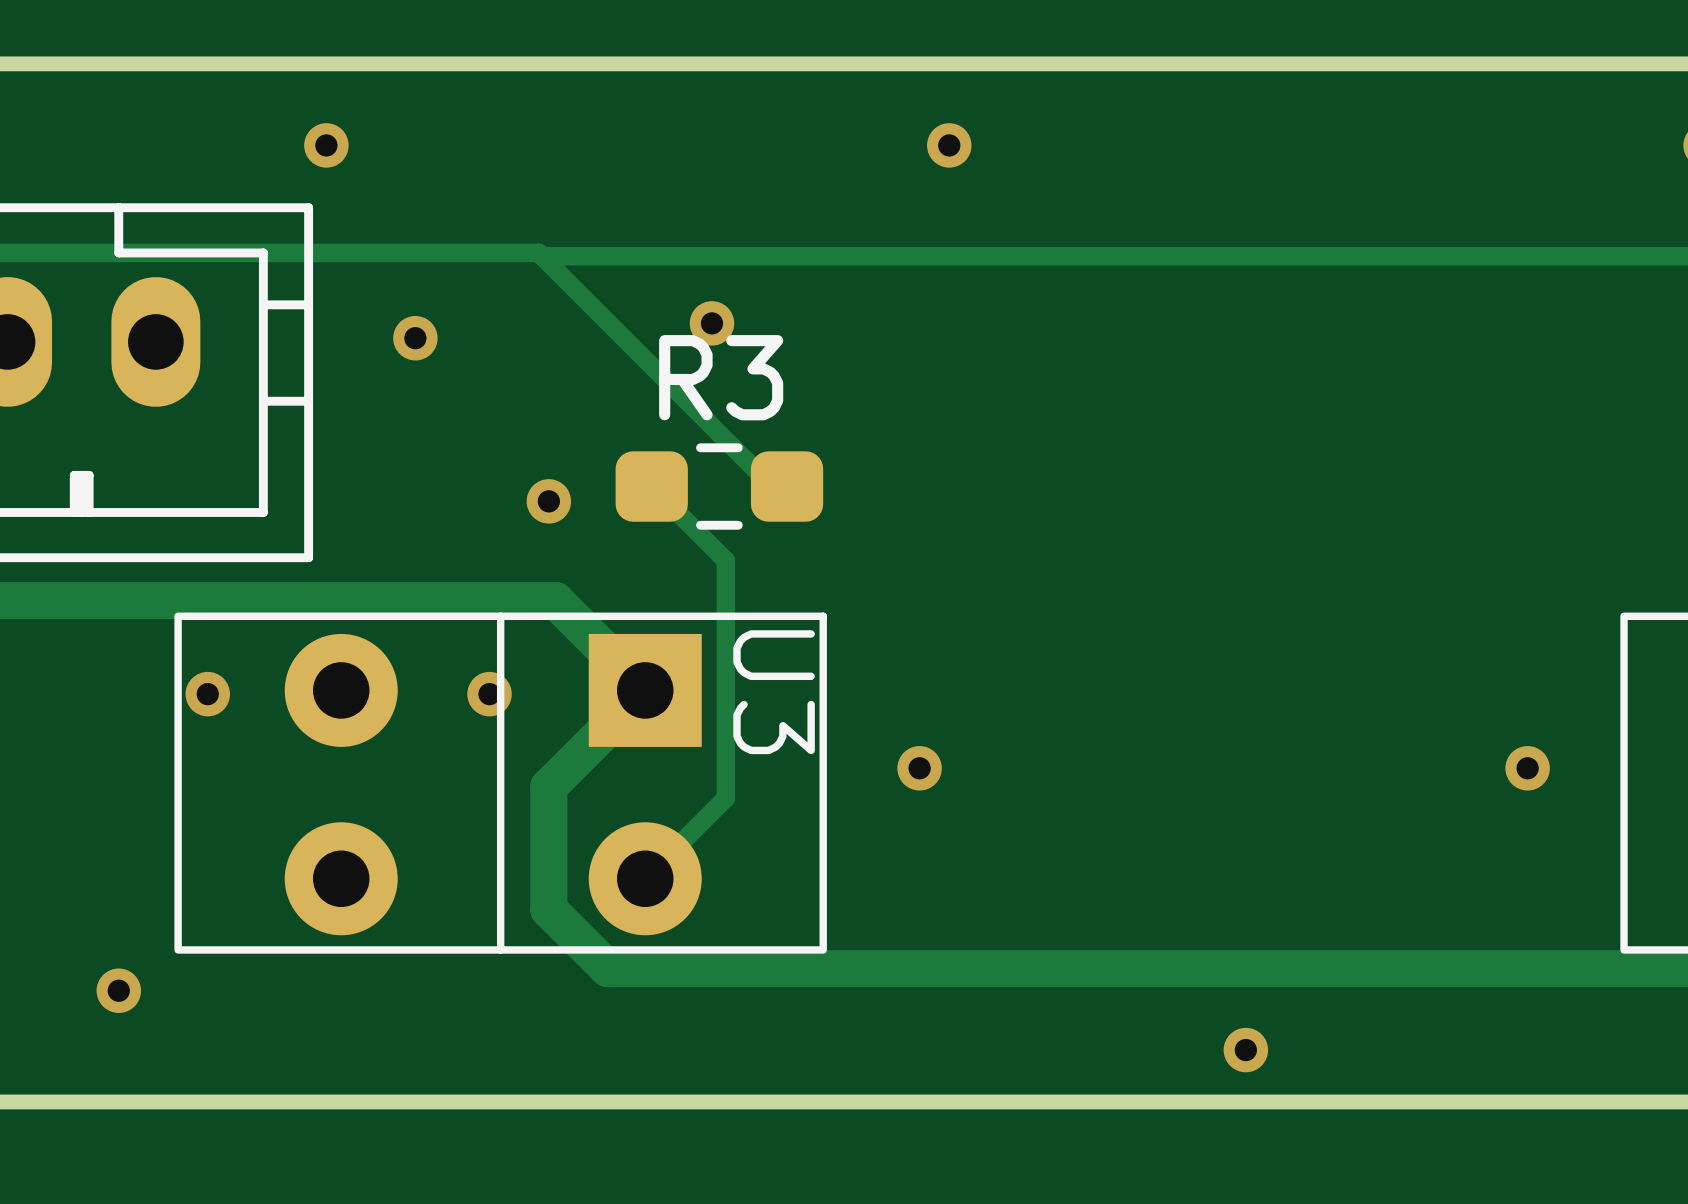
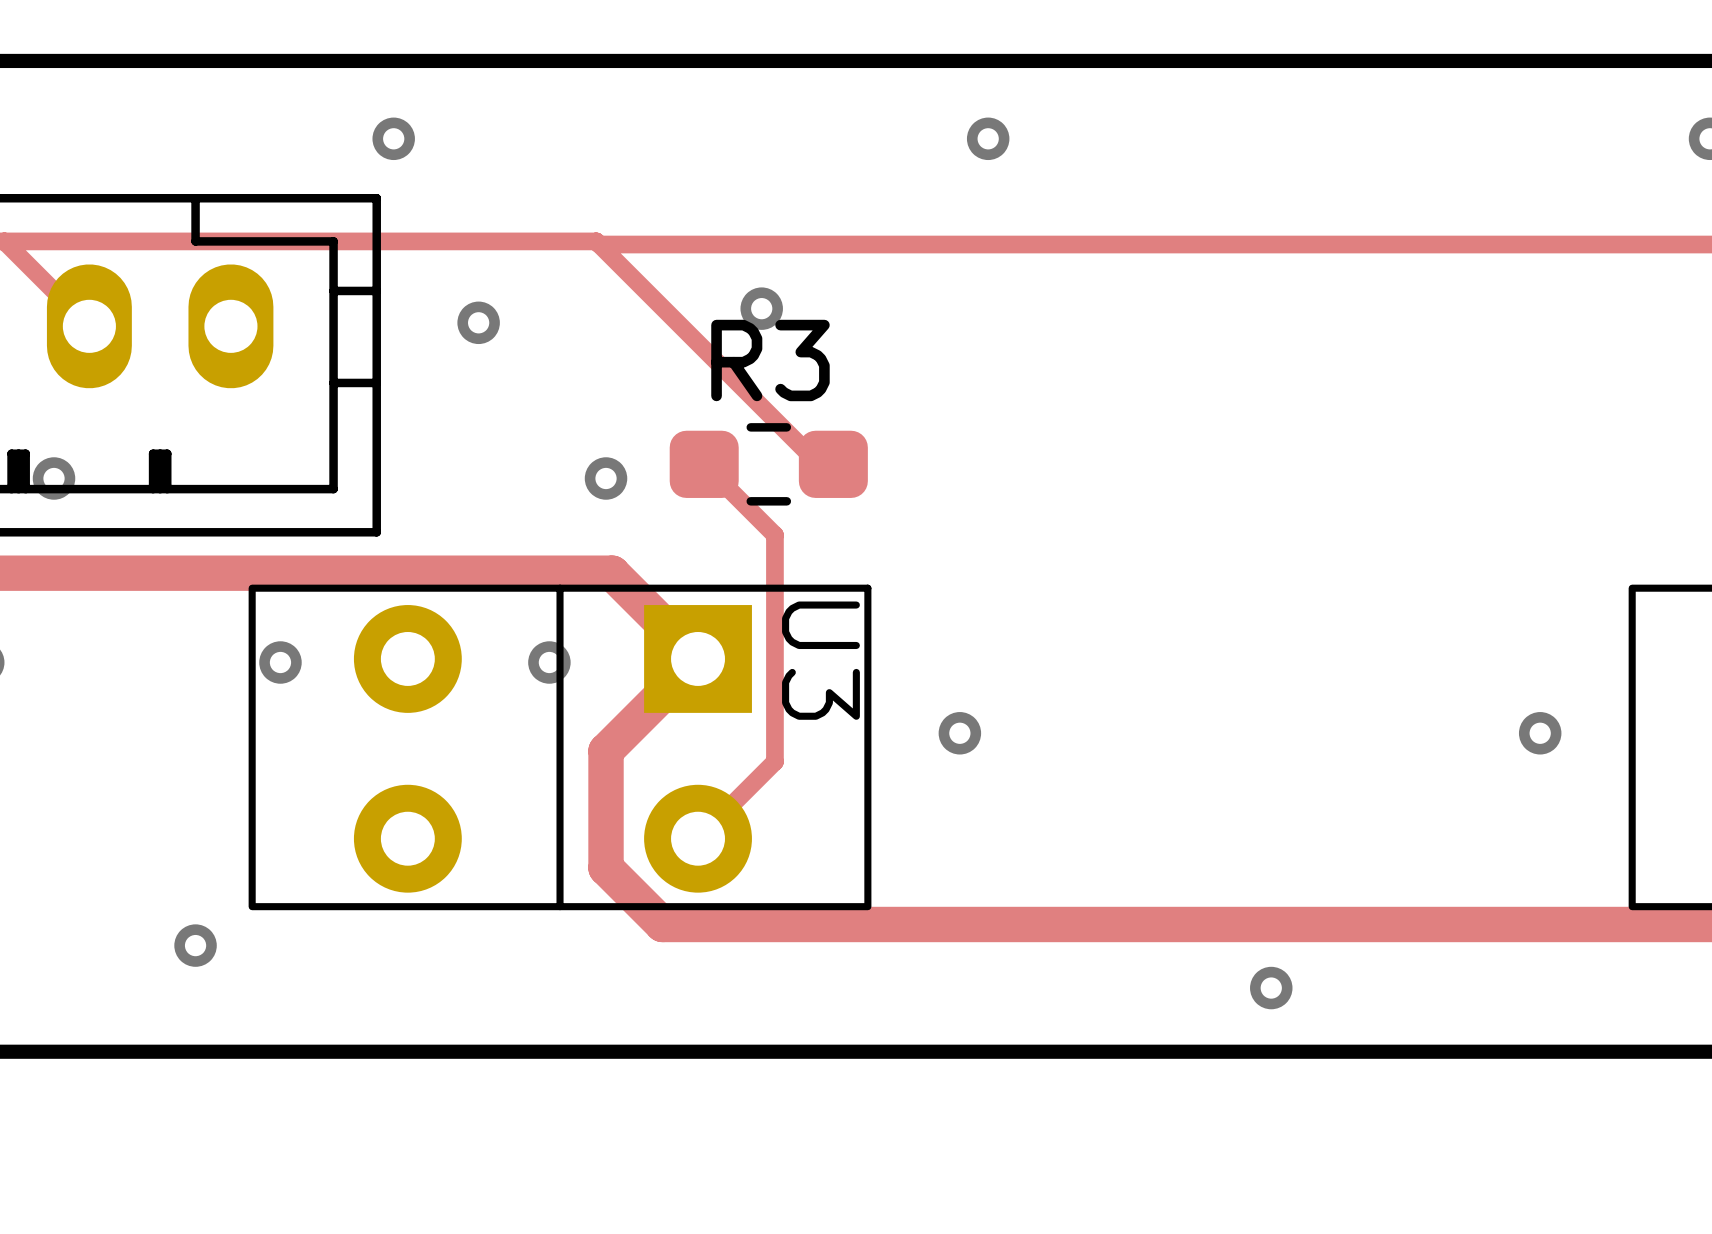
via position: (1245, 1050) -> (1271, 988)

